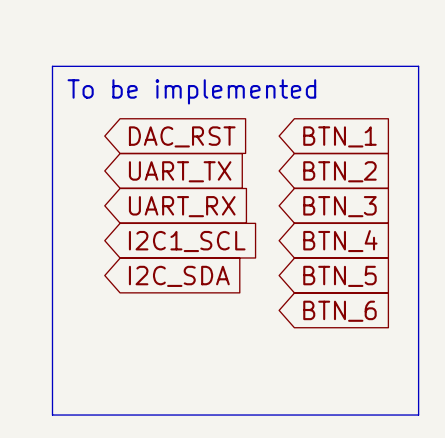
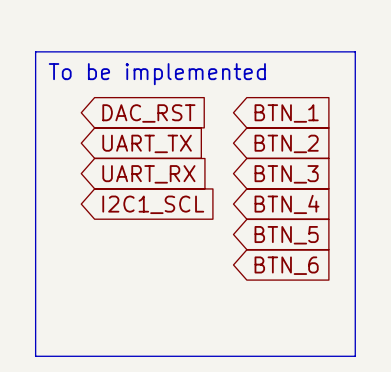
global label: I2C_SDA (179, 276) -> none

